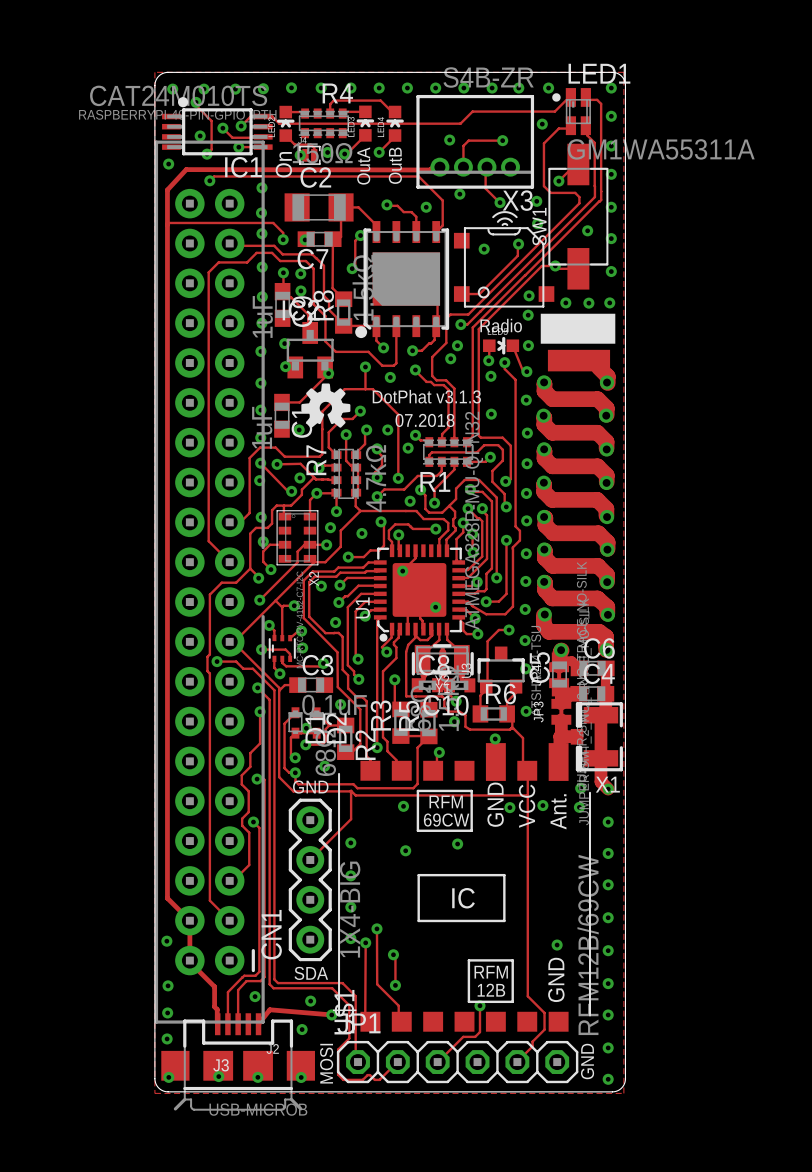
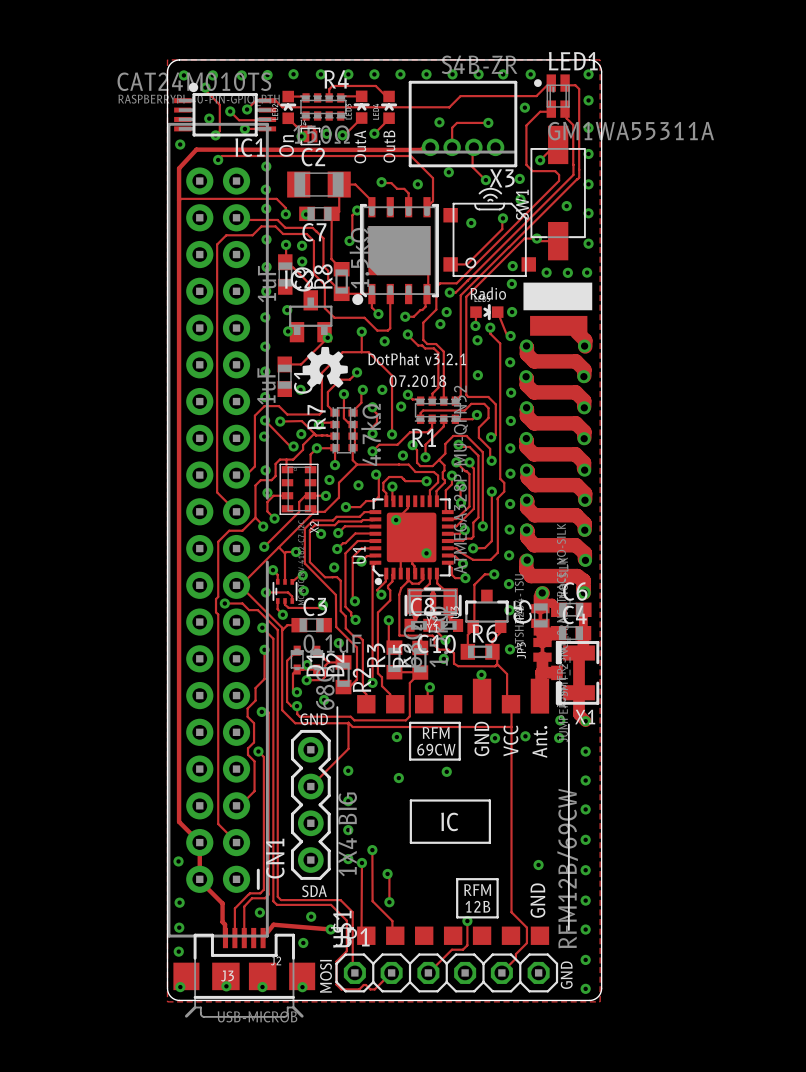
text: DotPhat v3.1.3 (426, 396) -> DotPhat v3.2.1 (417, 359)

